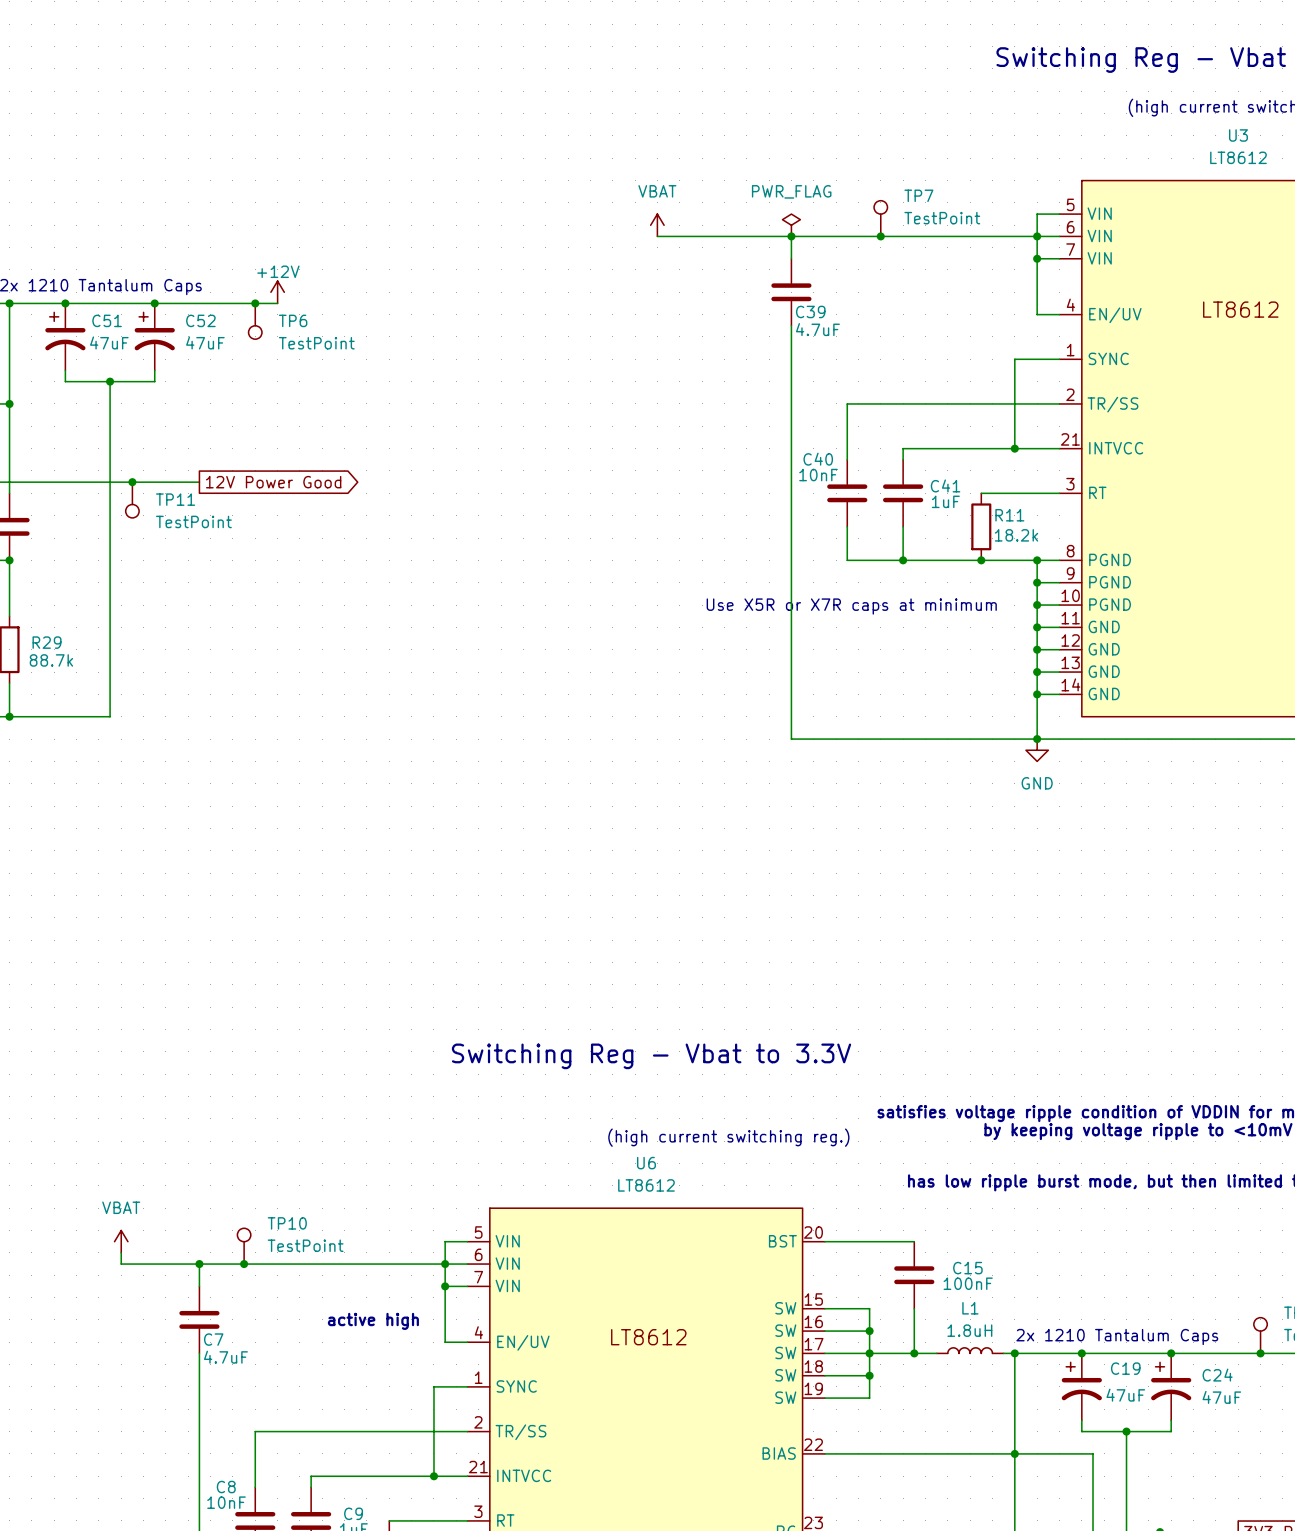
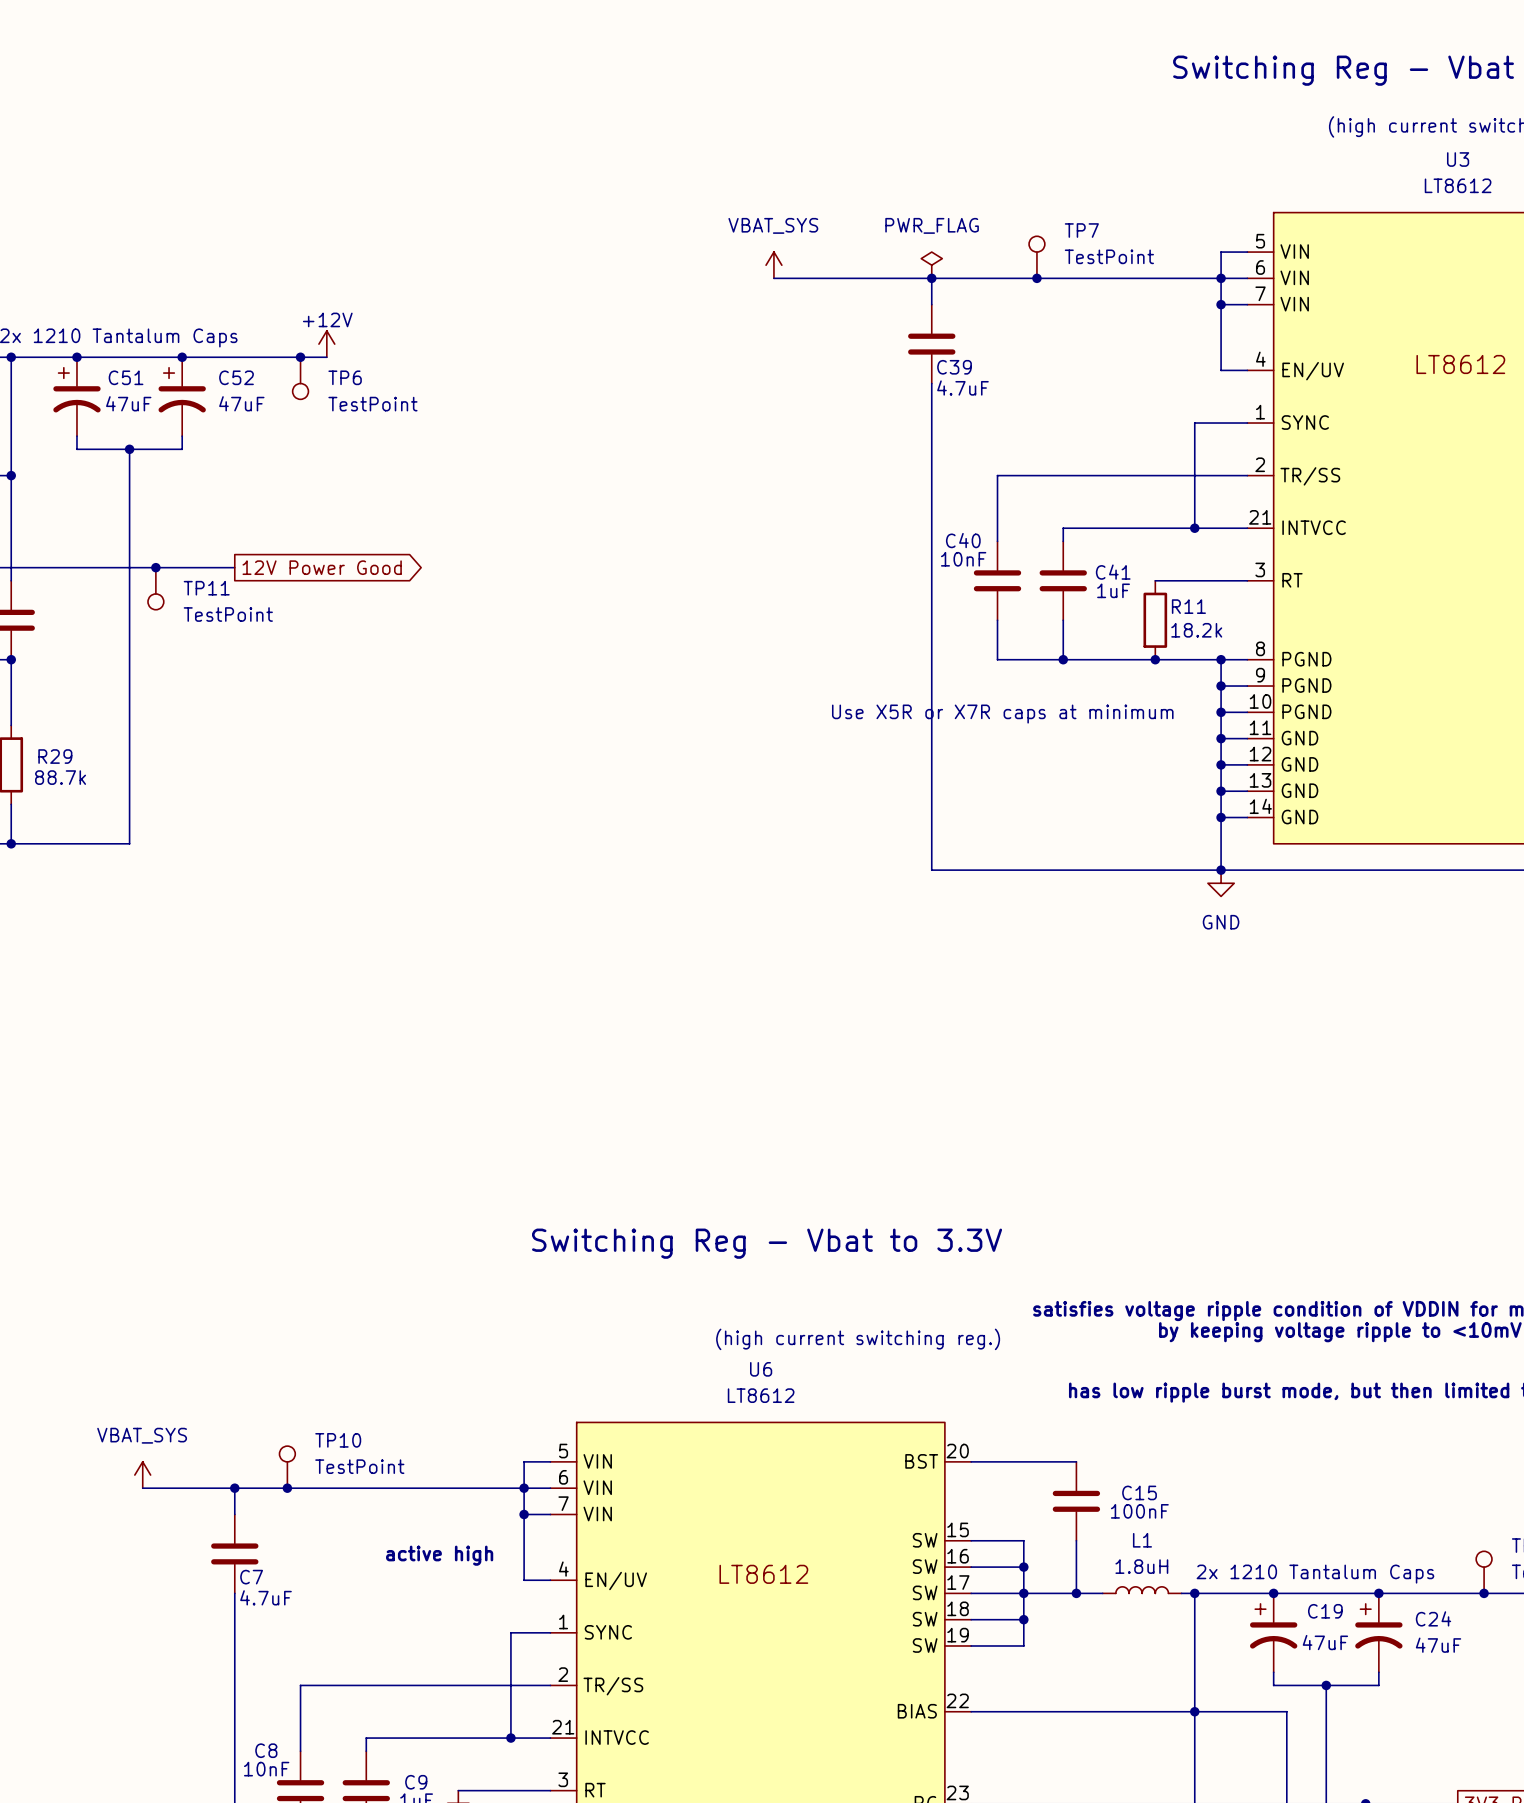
power symbol: VBAT (657, 225) -> VBAT_SYS (773, 265)
power symbol: VBAT (121, 1241) -> none
power symbol: none -> VBAT_SYS (142, 1475)

